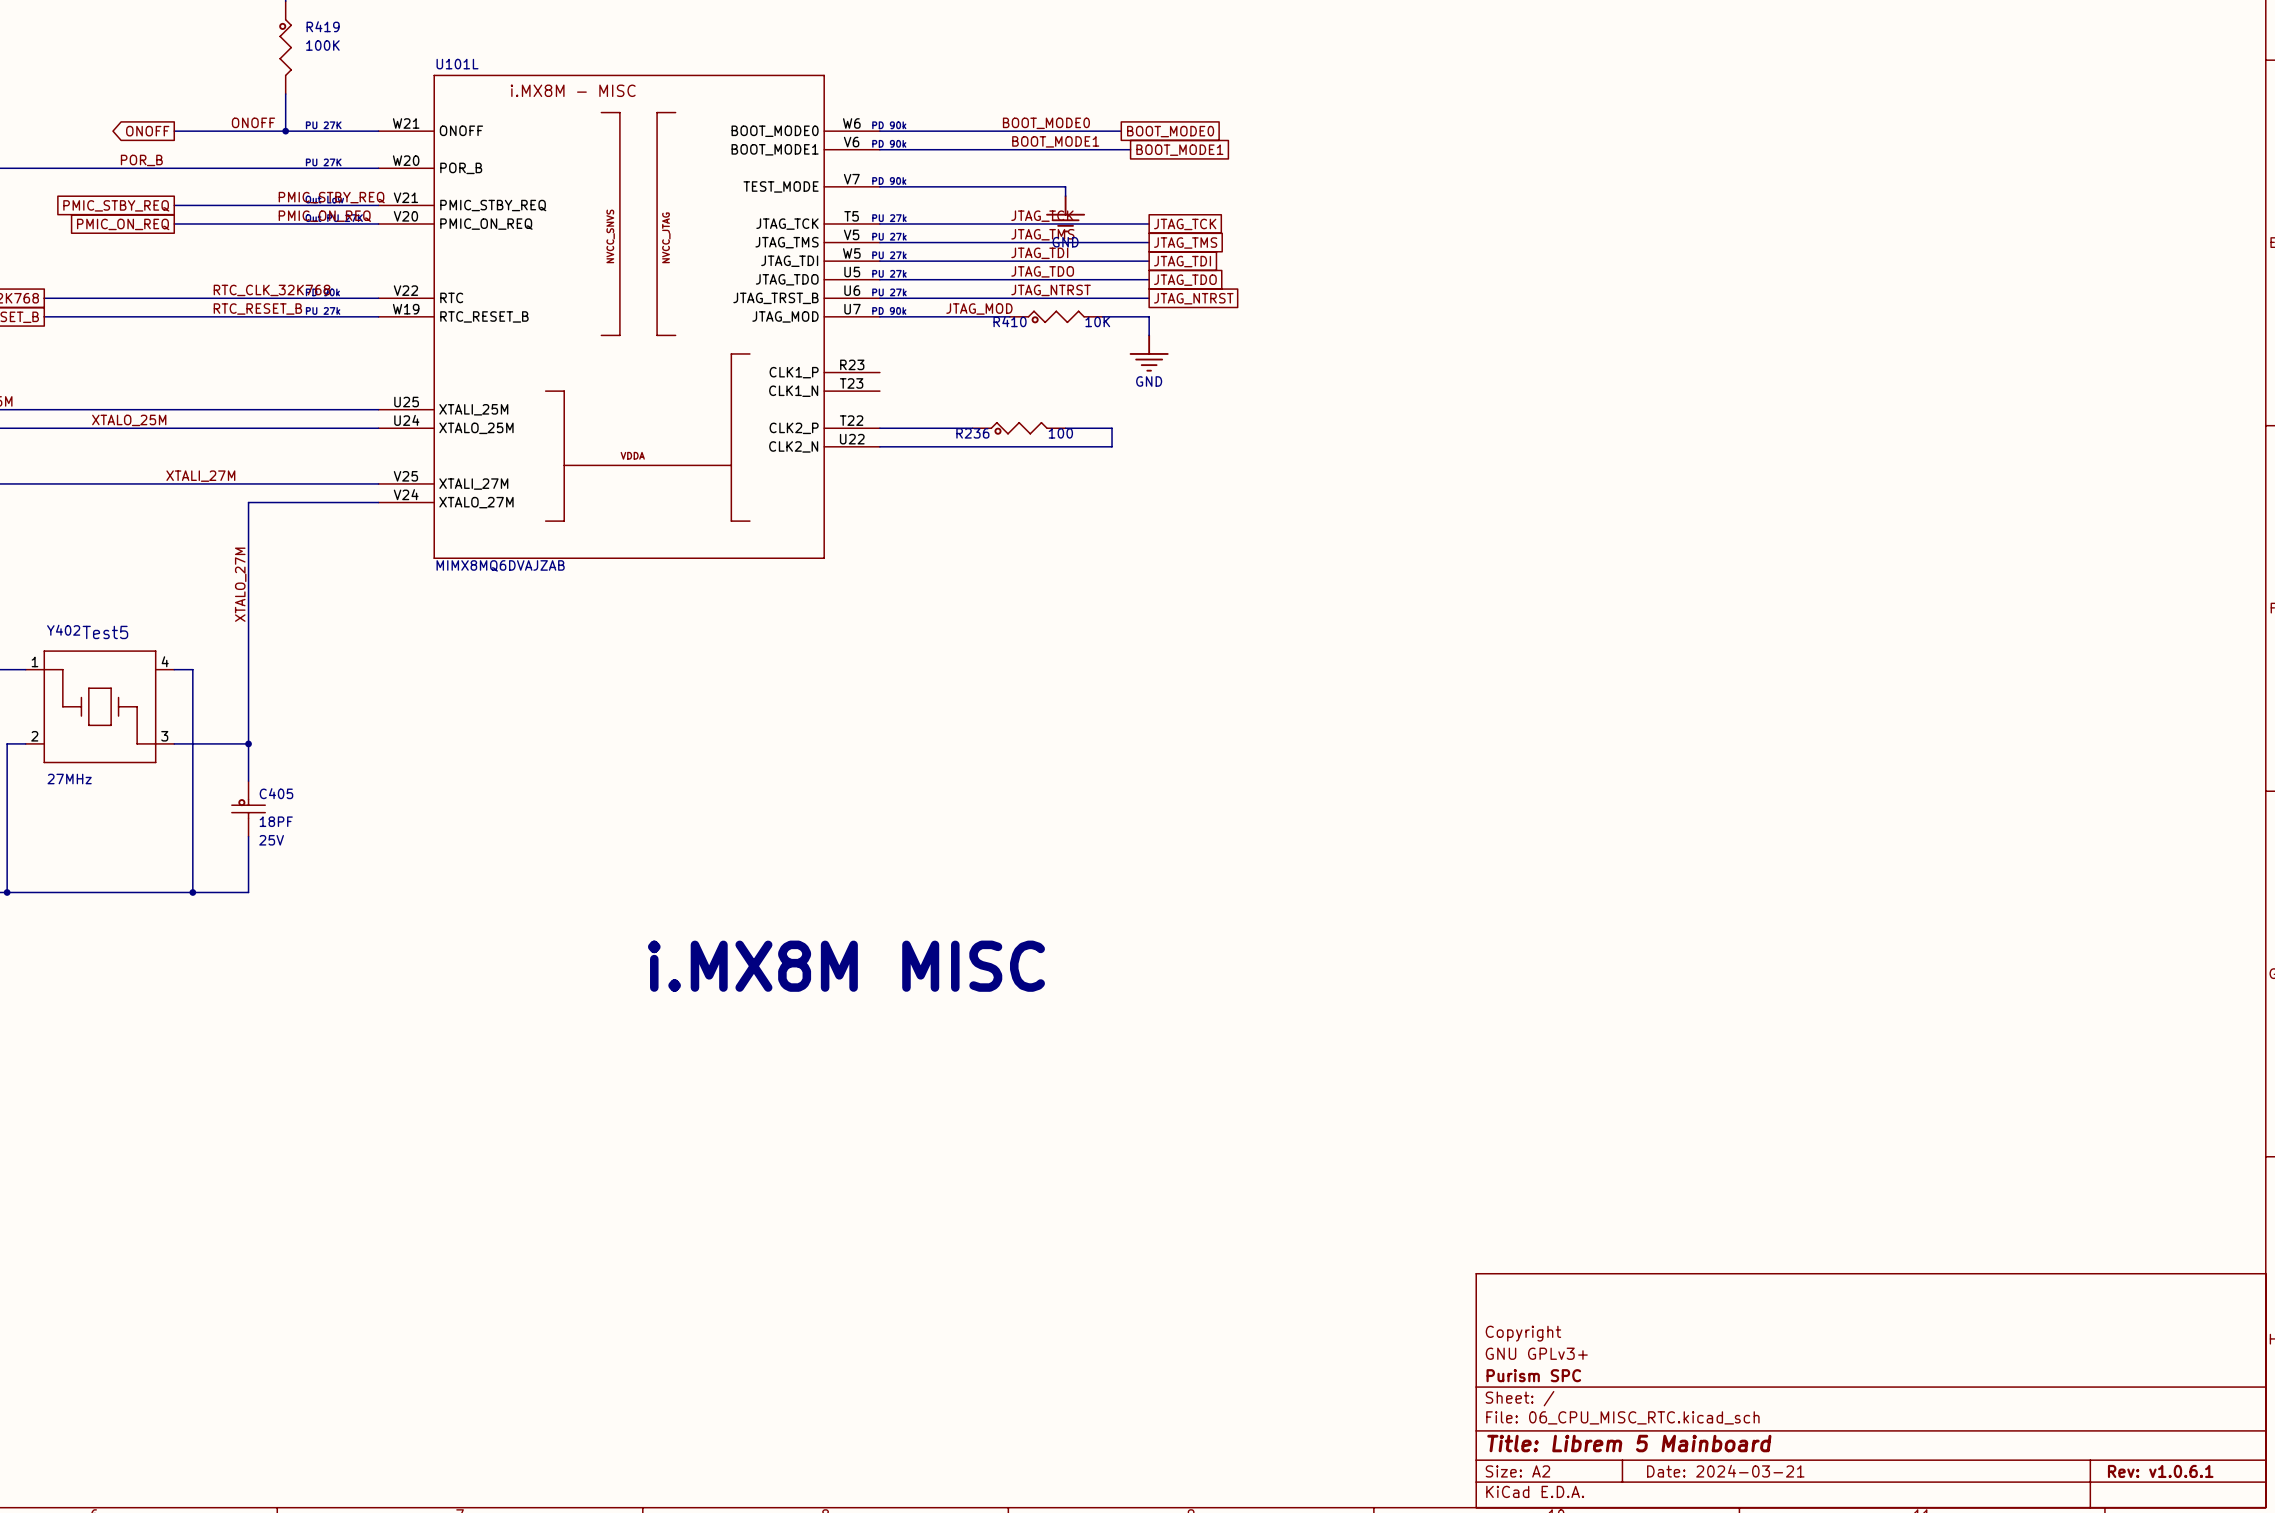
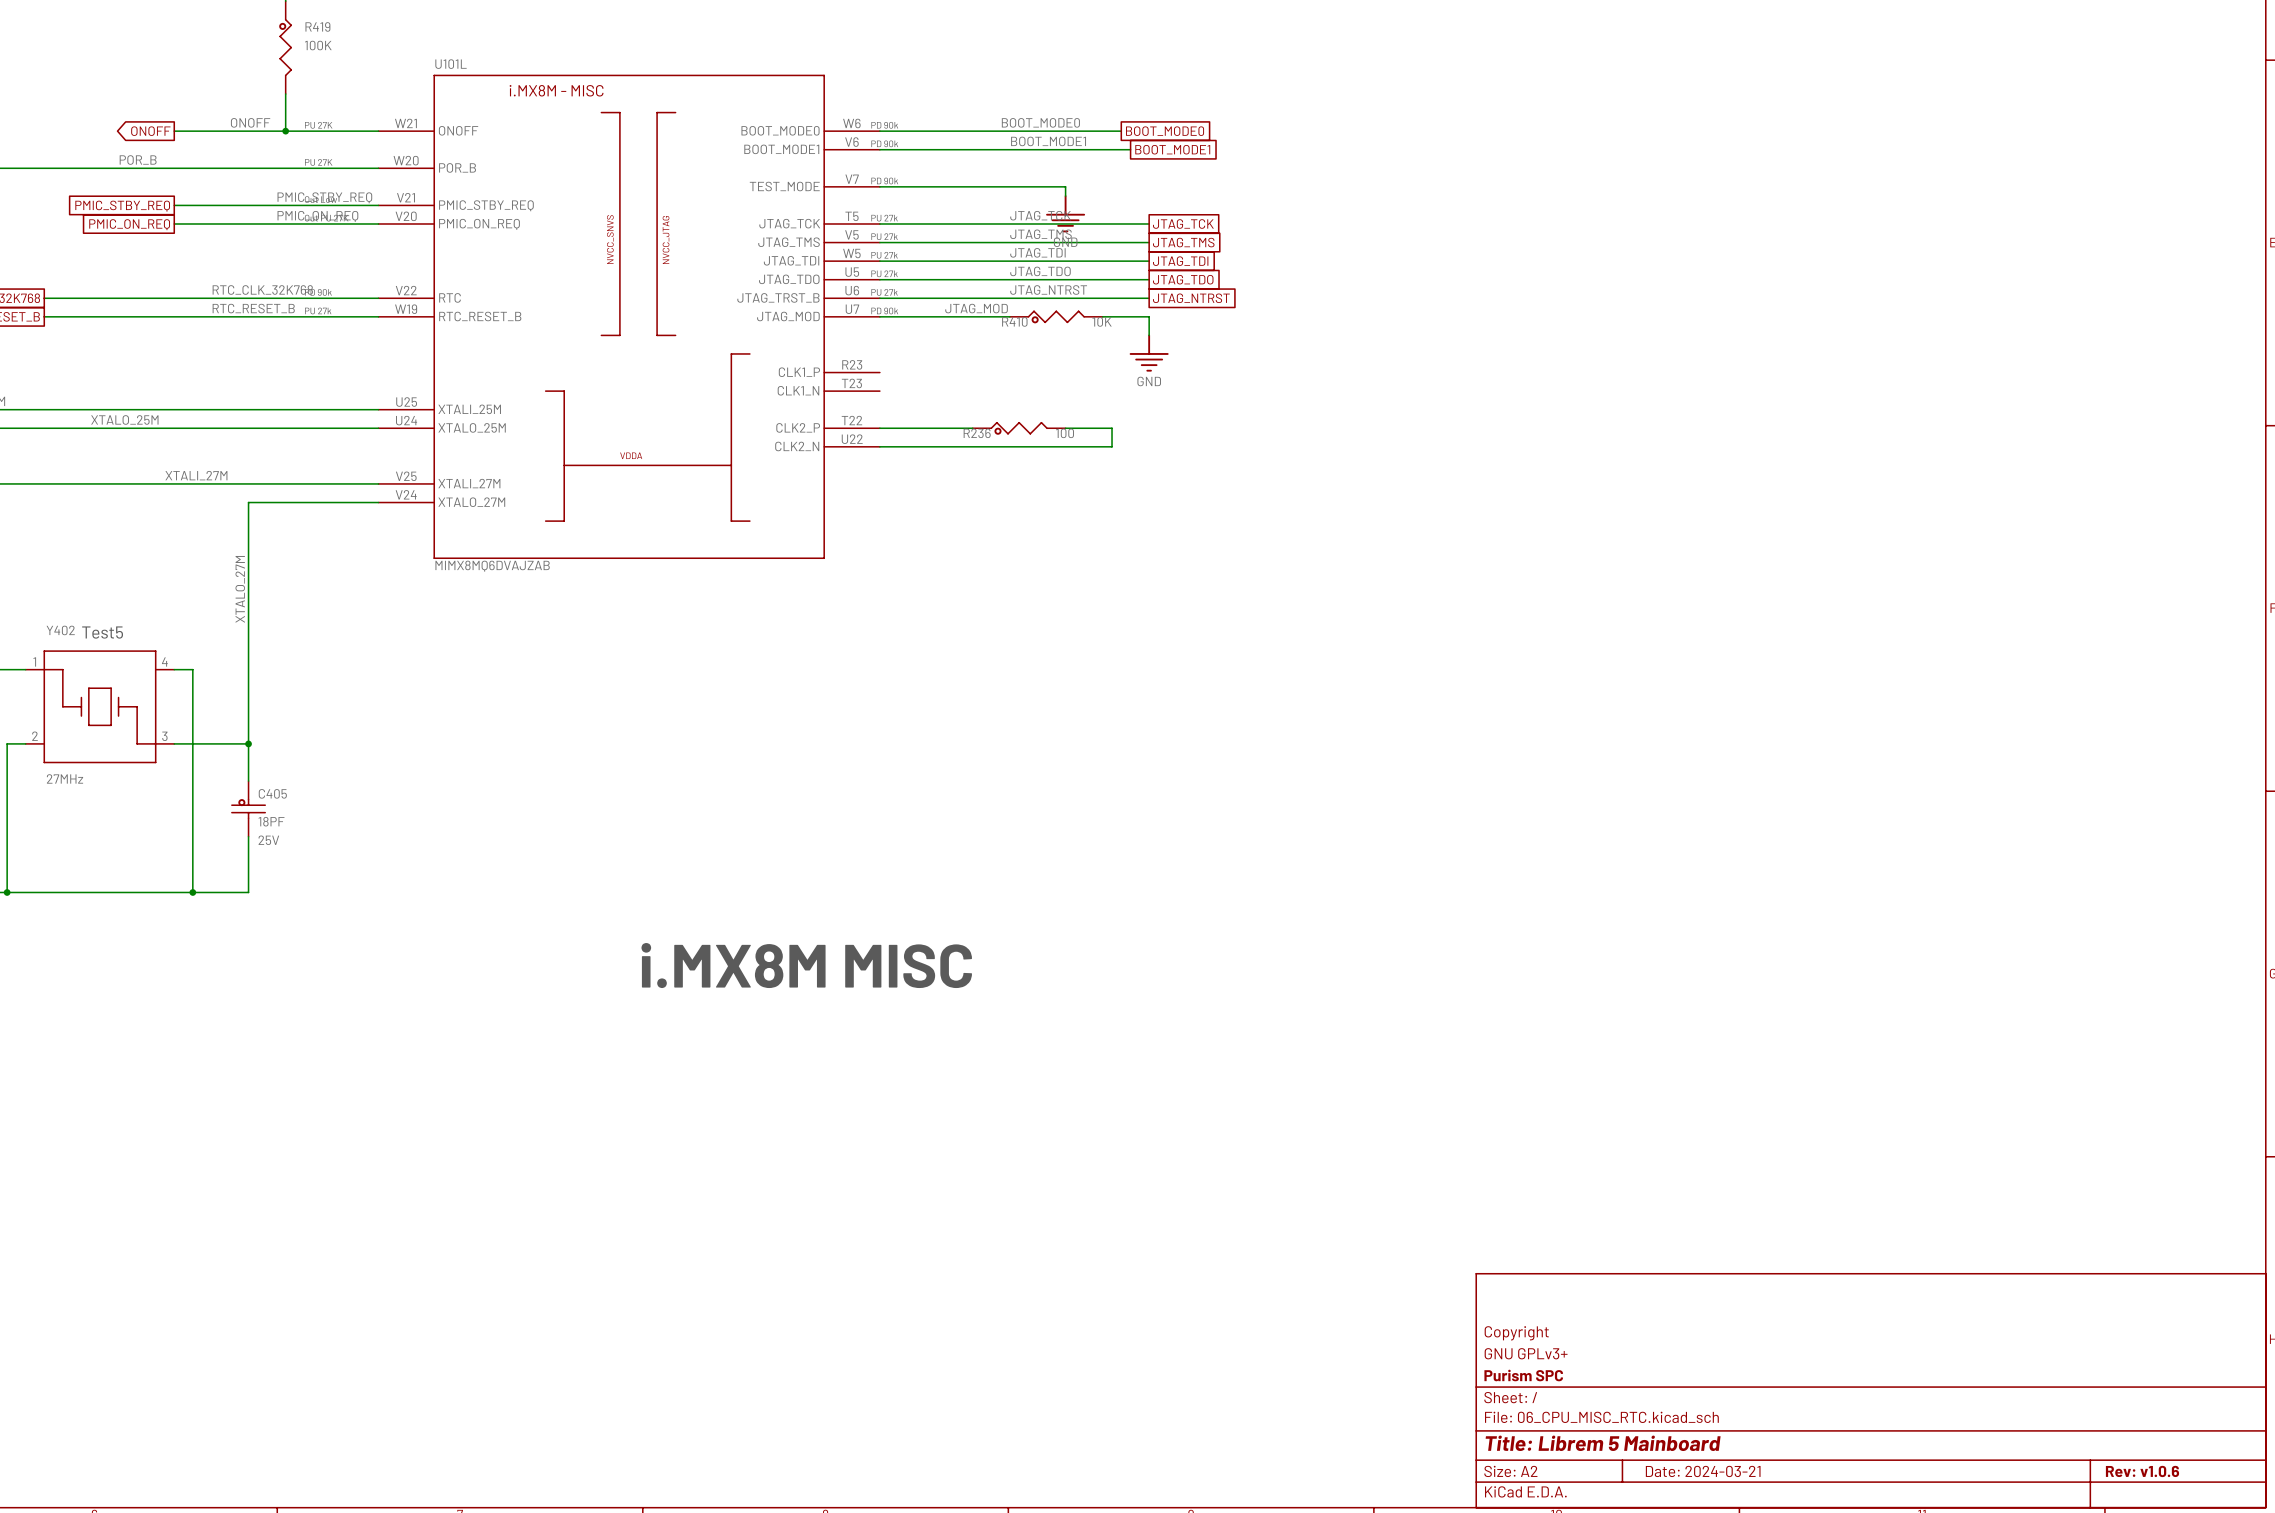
title block: Rev: v1.0.6.1 (2160, 1471) -> Rev: v1.0.6 (2142, 1471)

